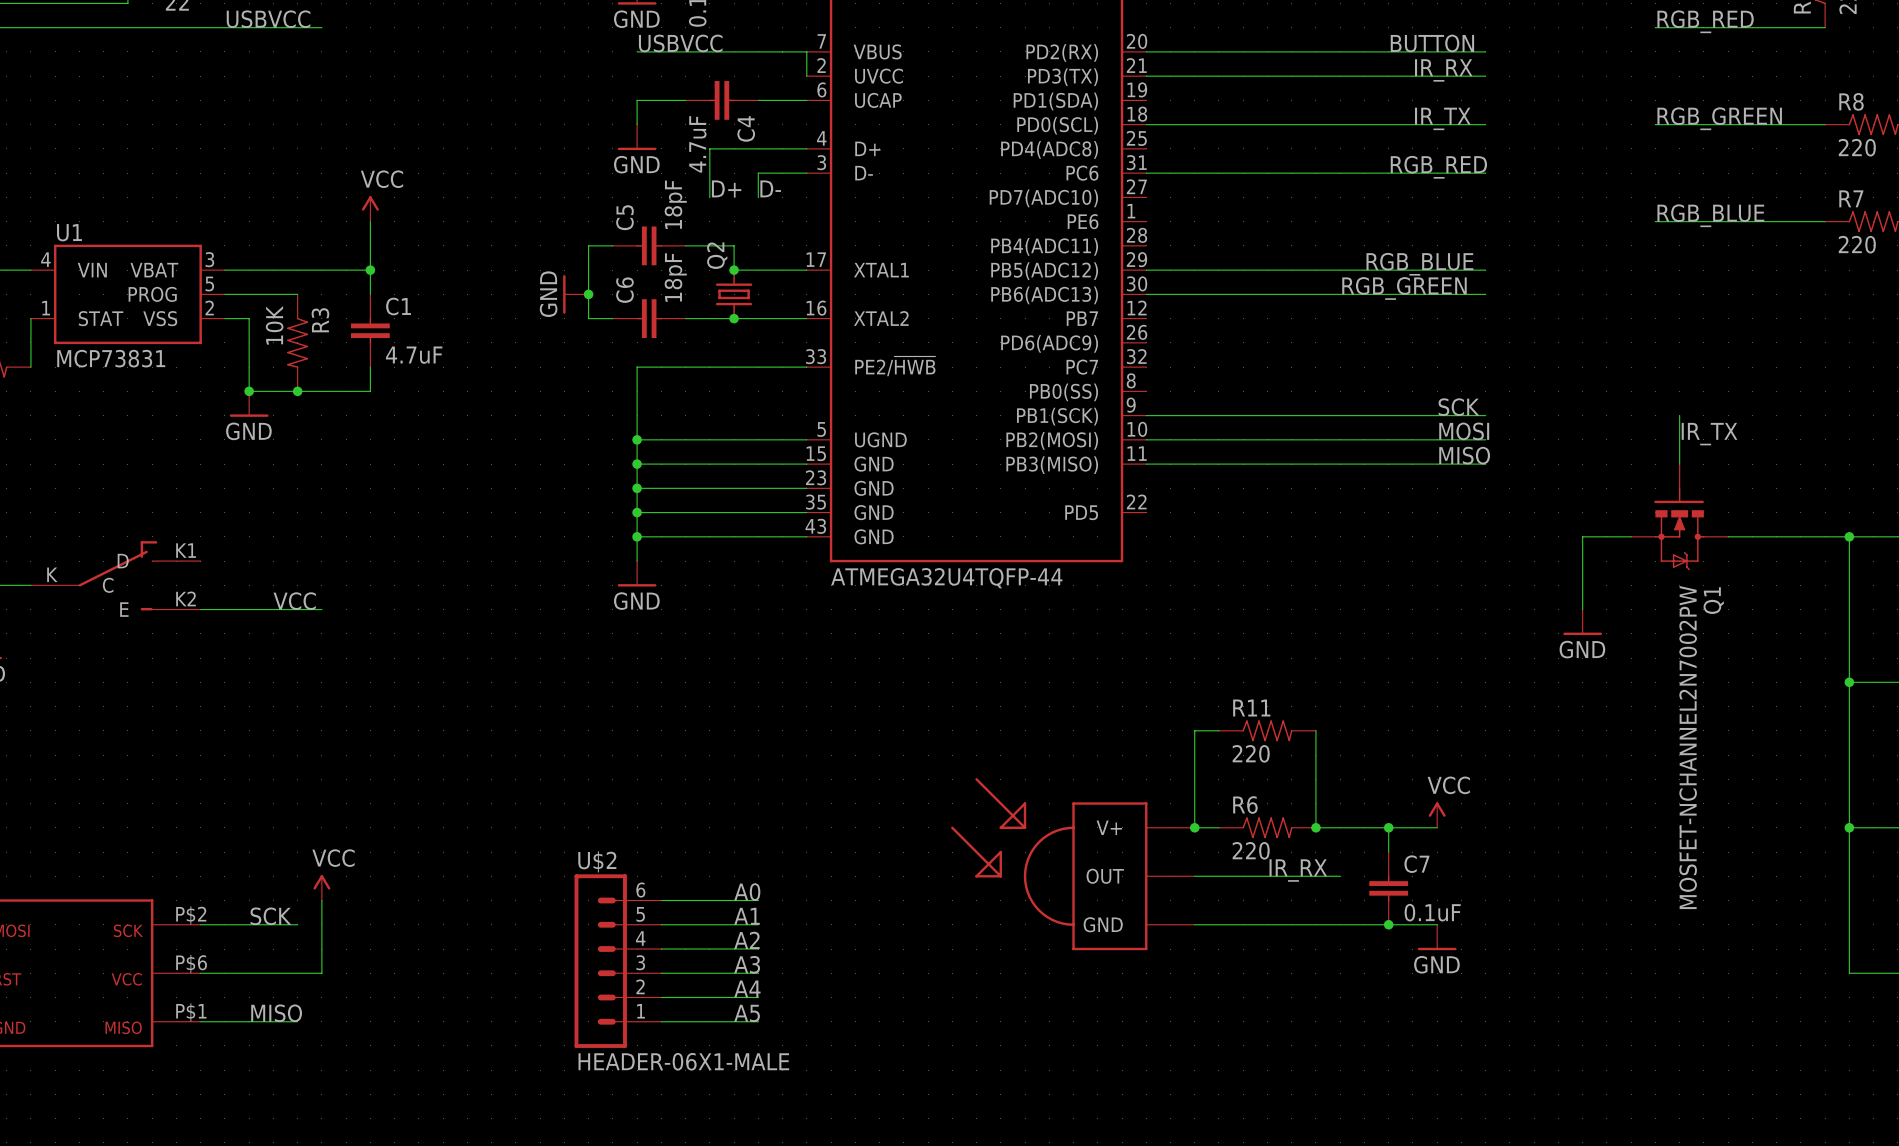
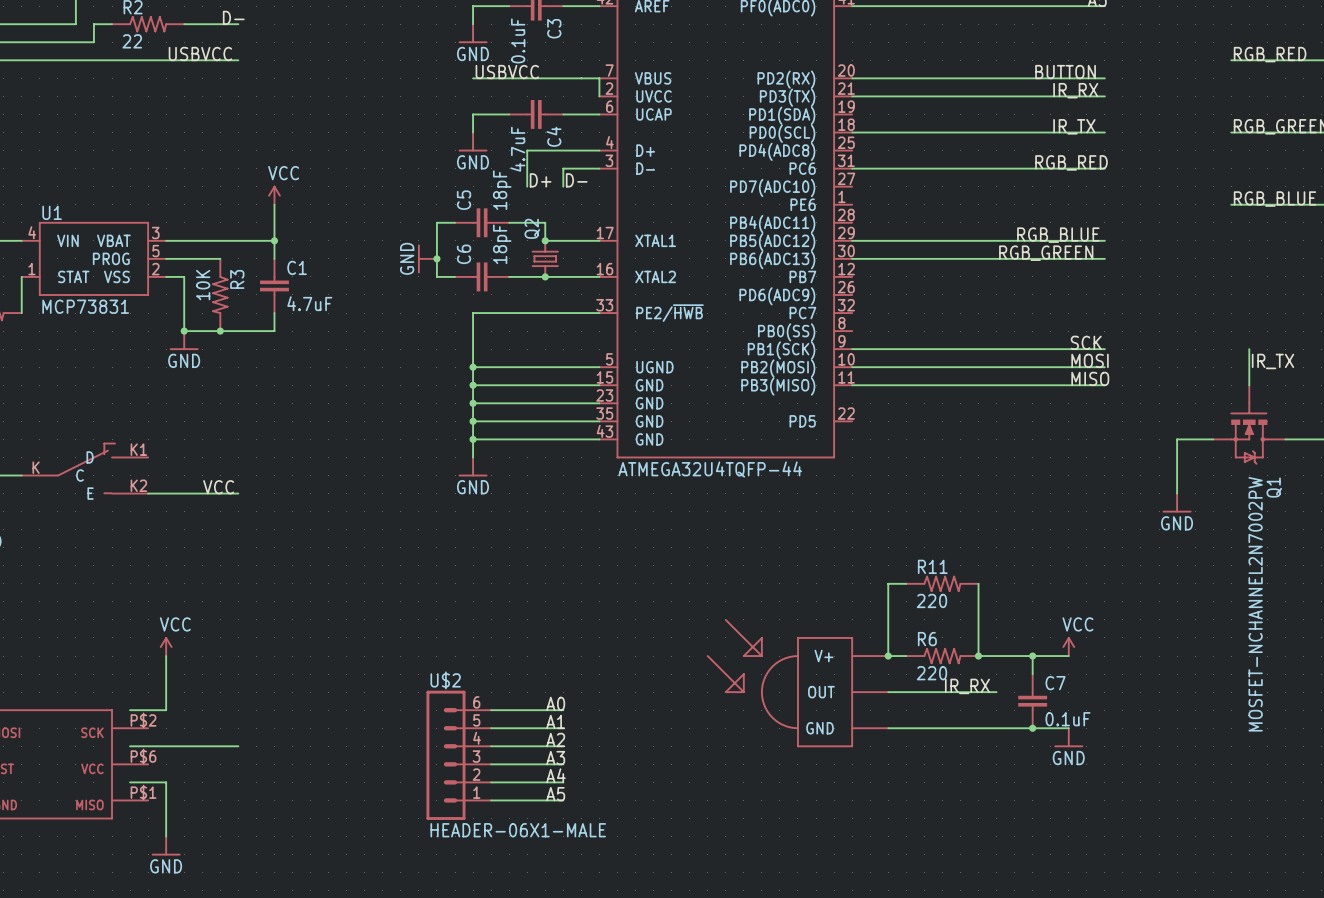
wire: none -> (166, 656) (166, 710) (130, 710)
power symbol position: VCC (321, 887) -> VCC (166, 646)
wire: (321, 900) (321, 973) (200, 973) -> none
label: SCK (270, 916) -> none
wire: (200, 924) (297, 924) -> none
wire: none -> (130, 746) (238, 746)
wire: none -> (130, 782) (166, 782) (166, 836)
label: MISO (276, 1013) -> none
wire: (200, 1021) (297, 1021) -> none
power symbol: none -> GND (166, 846)

